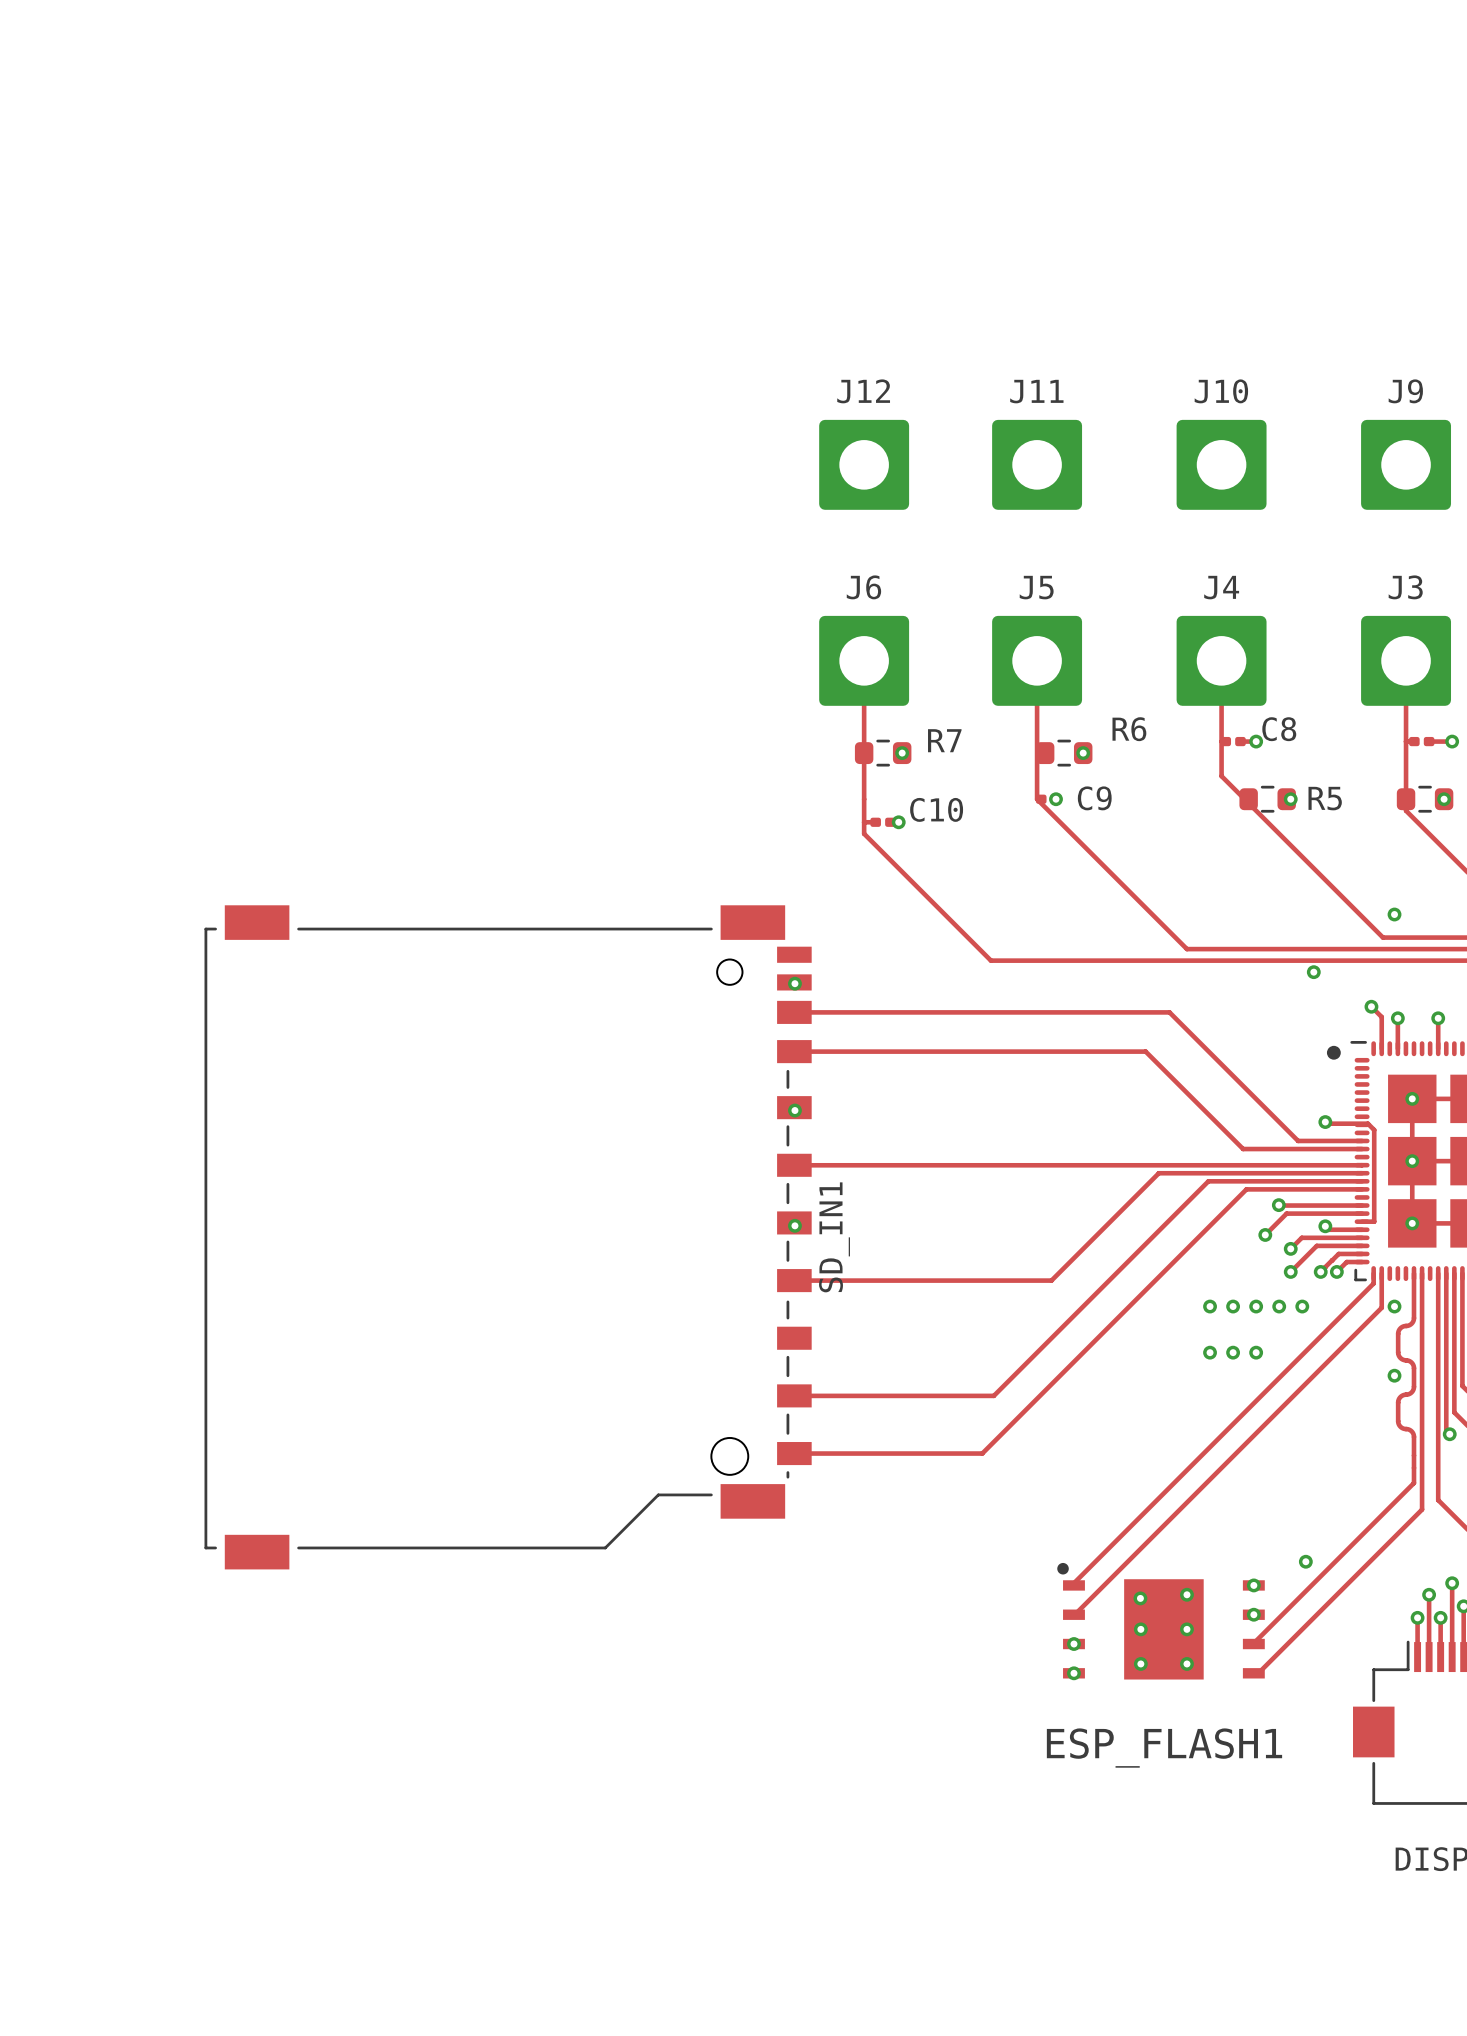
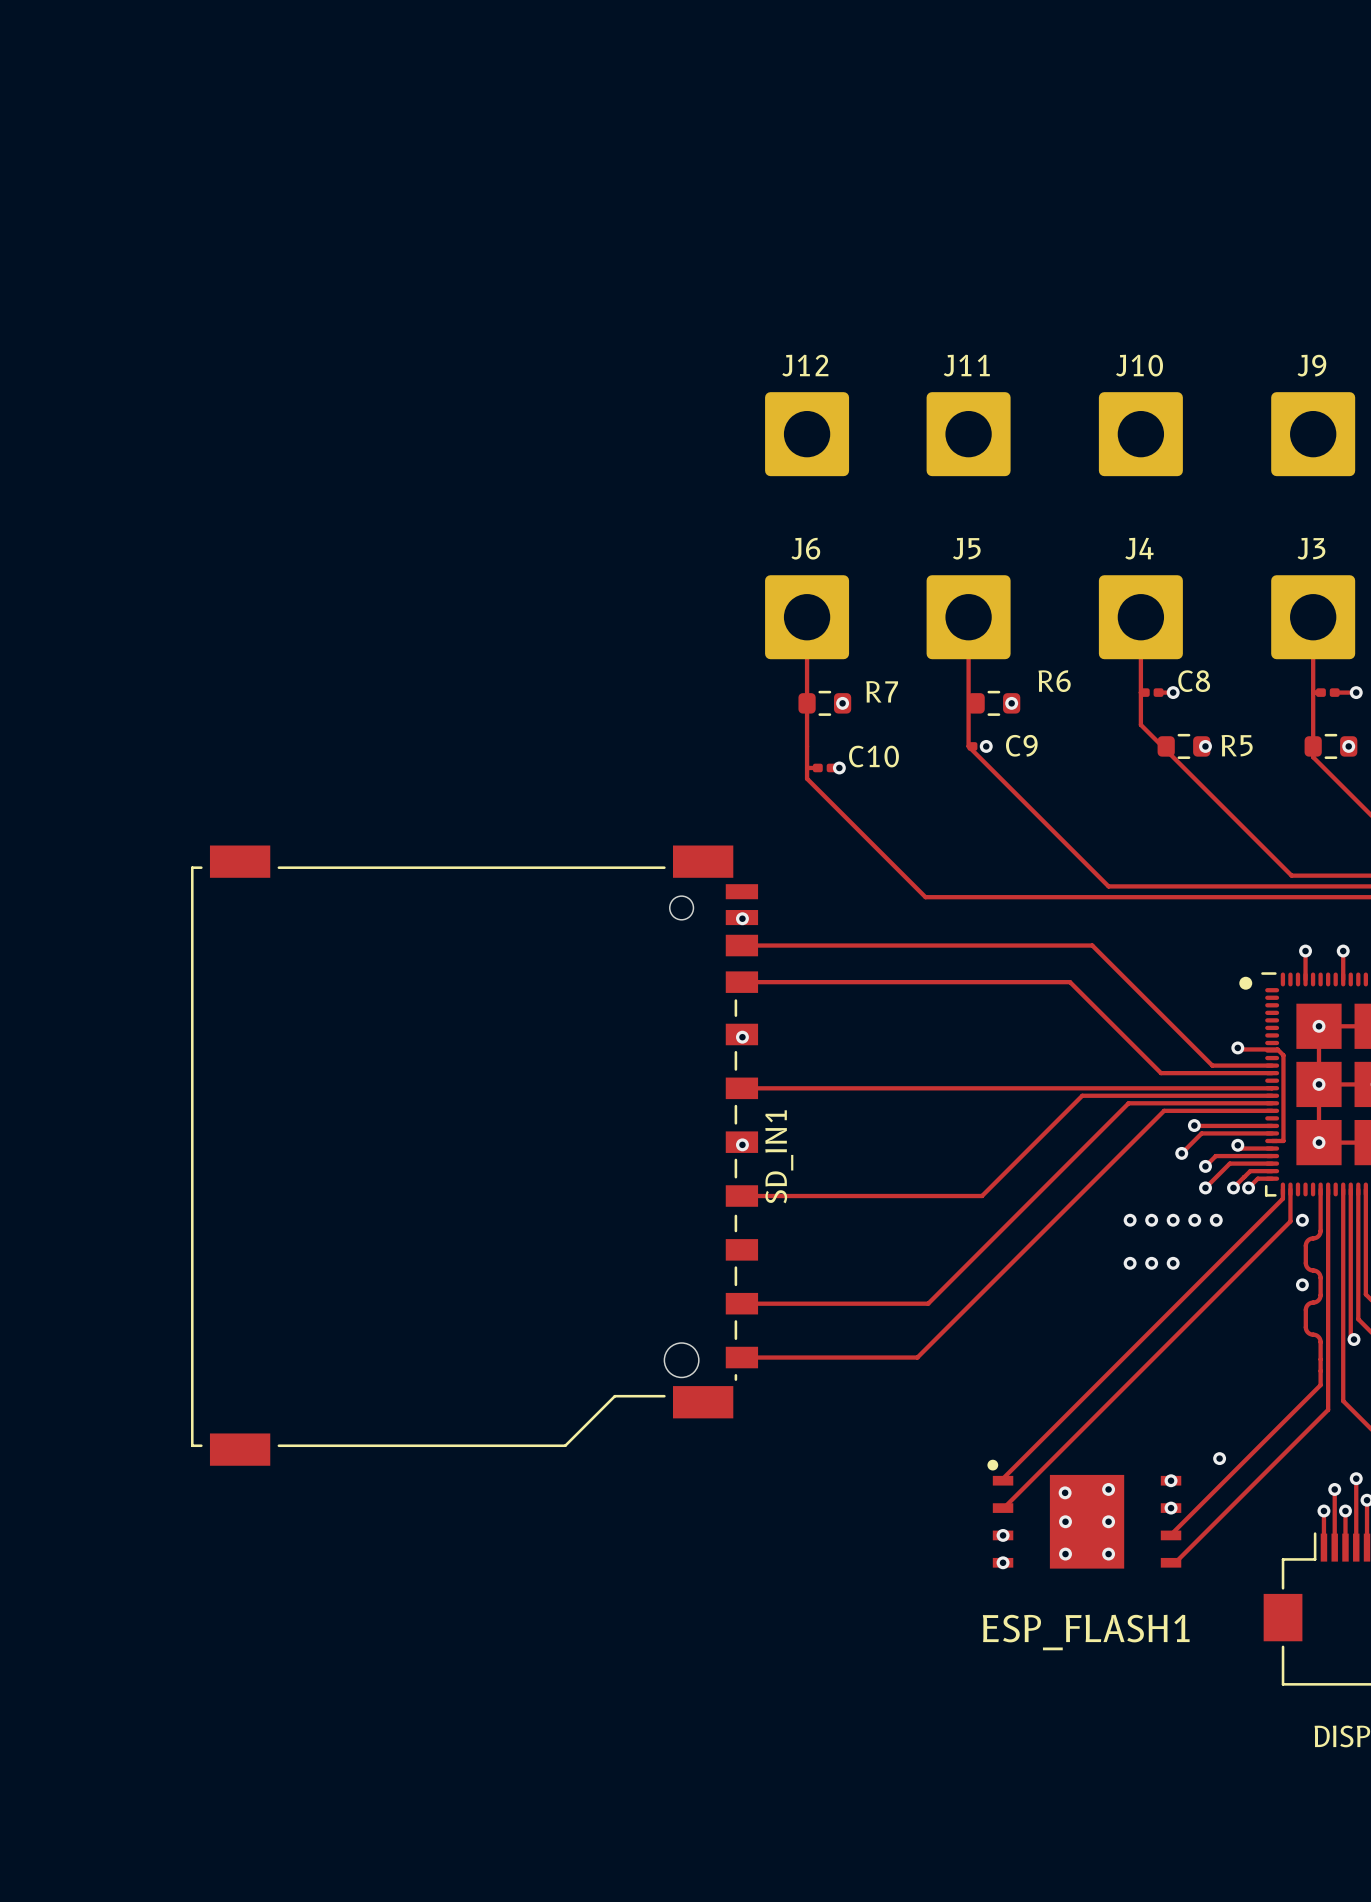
via: (1394, 914) -> none
via: (1313, 972) -> none
track: (1371, 1006) (1381, 1017) (1381, 1048) -> none
via: (1371, 1006) -> none

